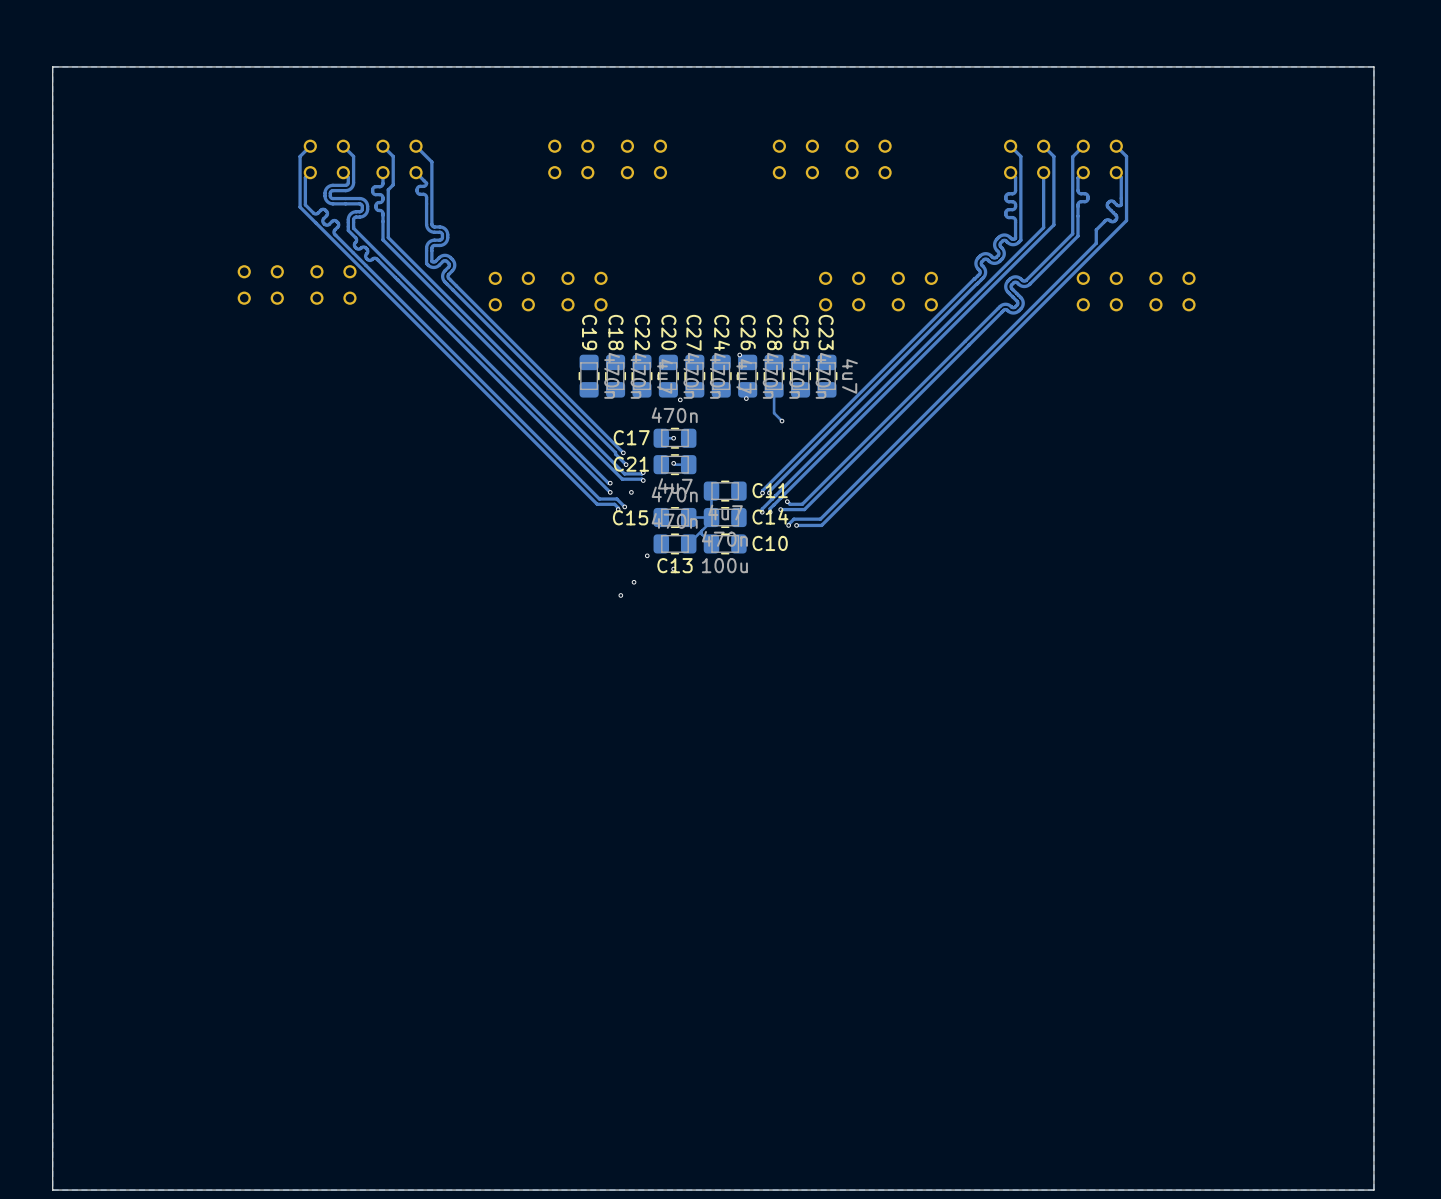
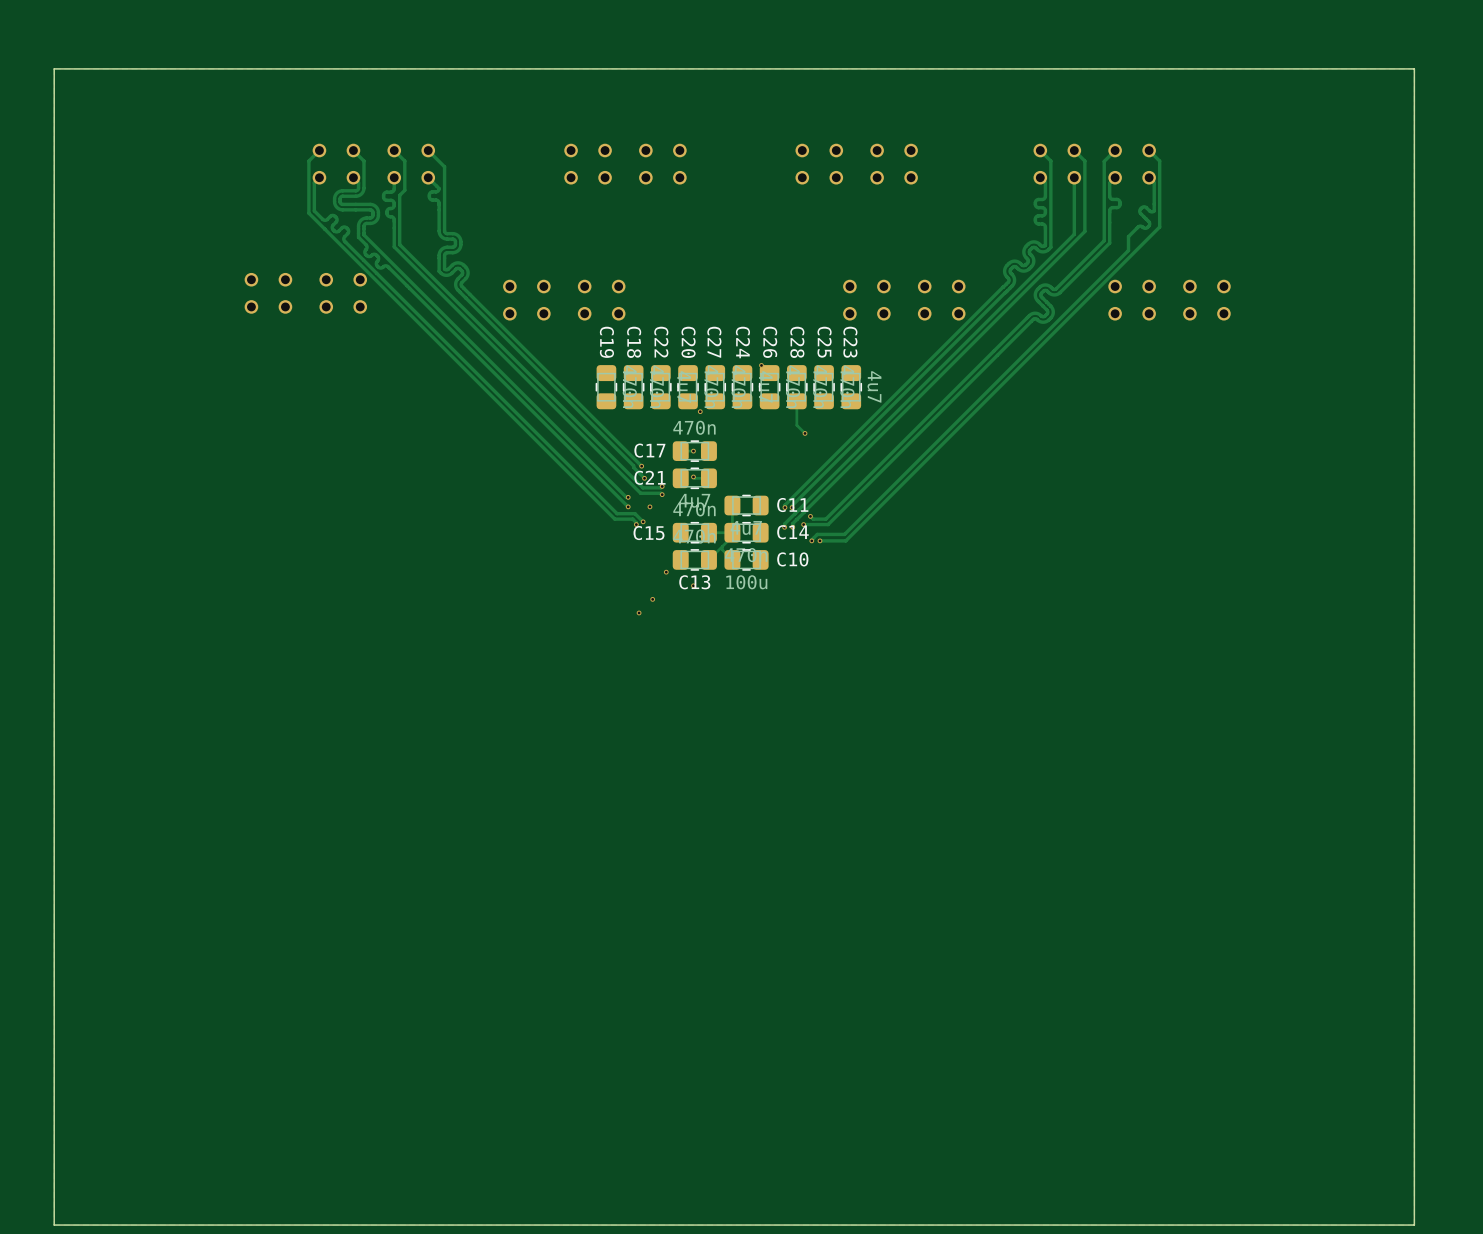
via: (746, 398) -> none

